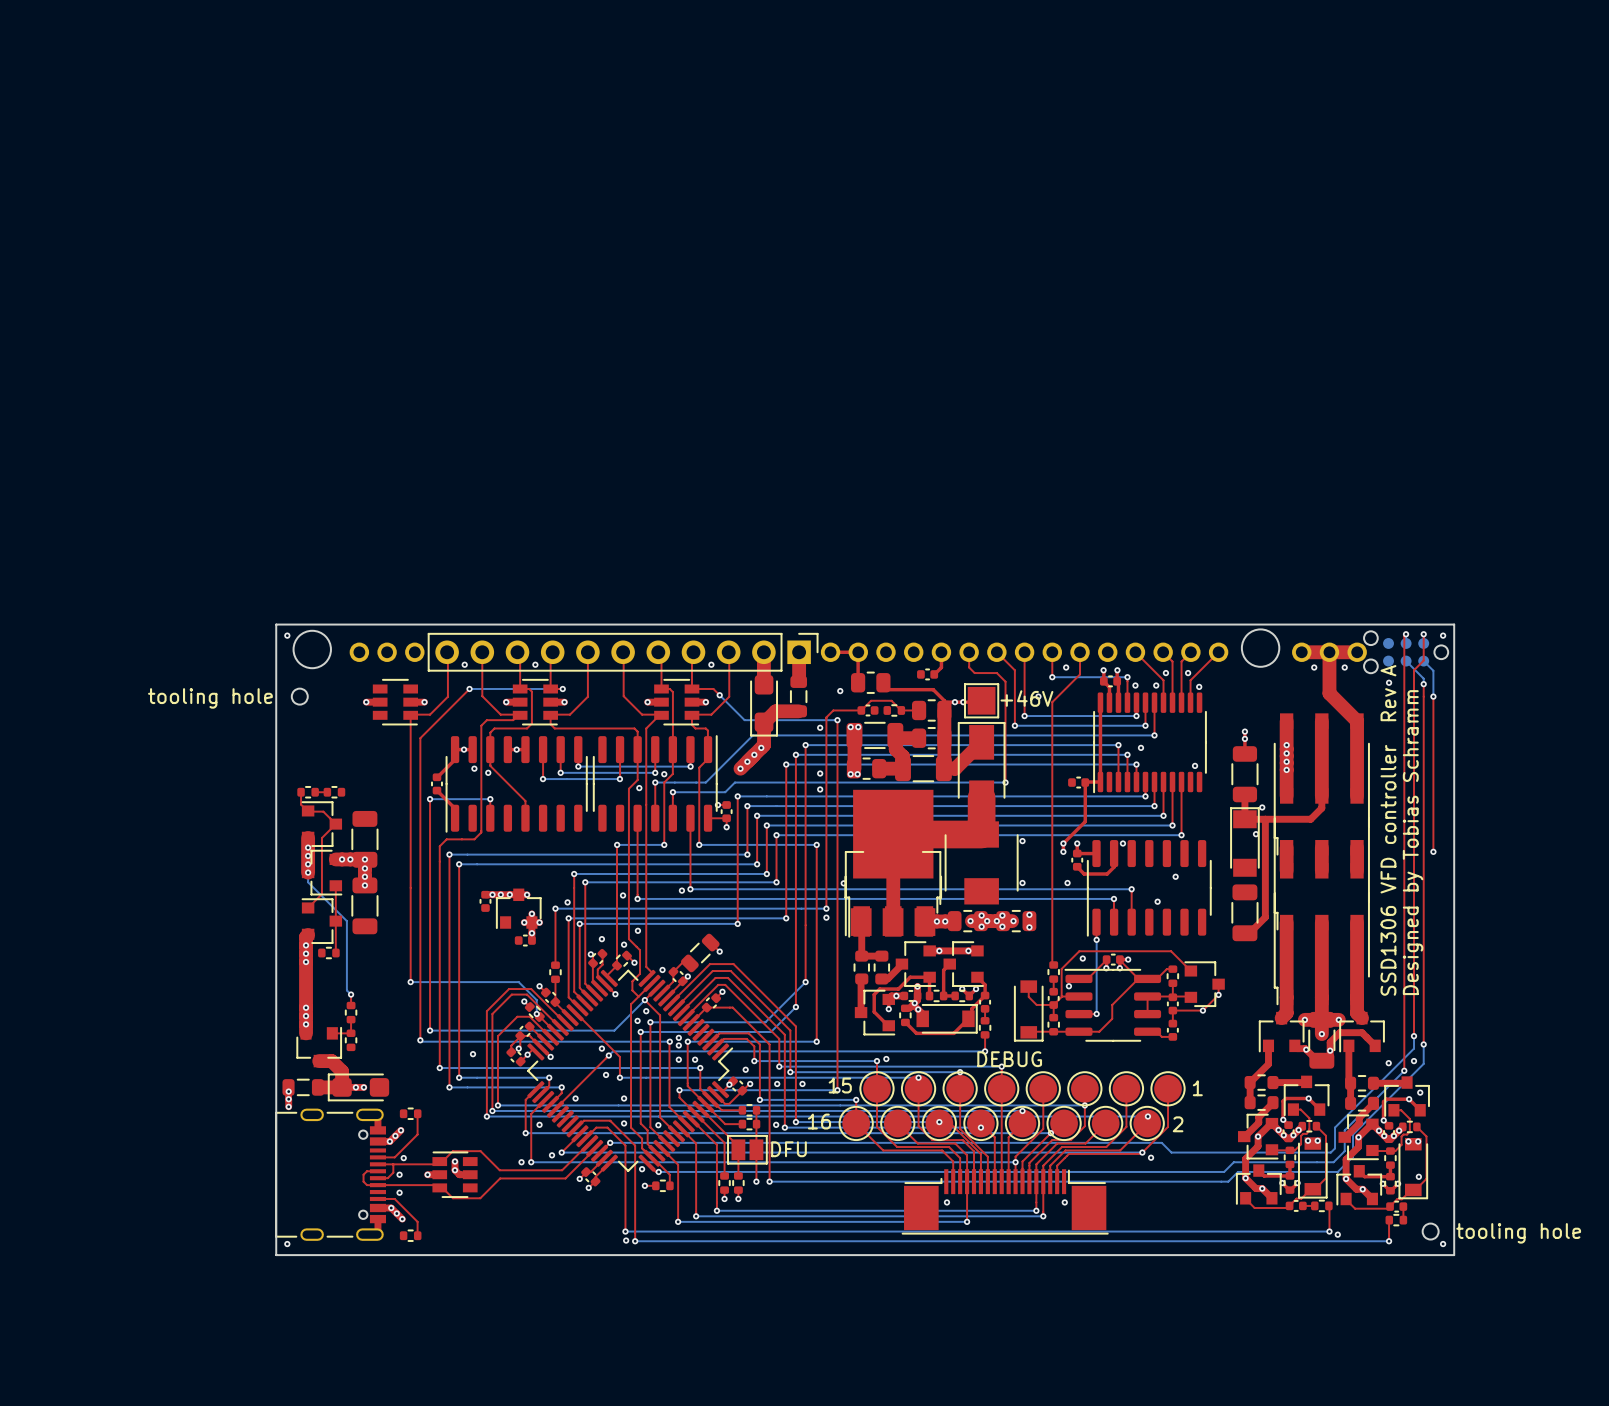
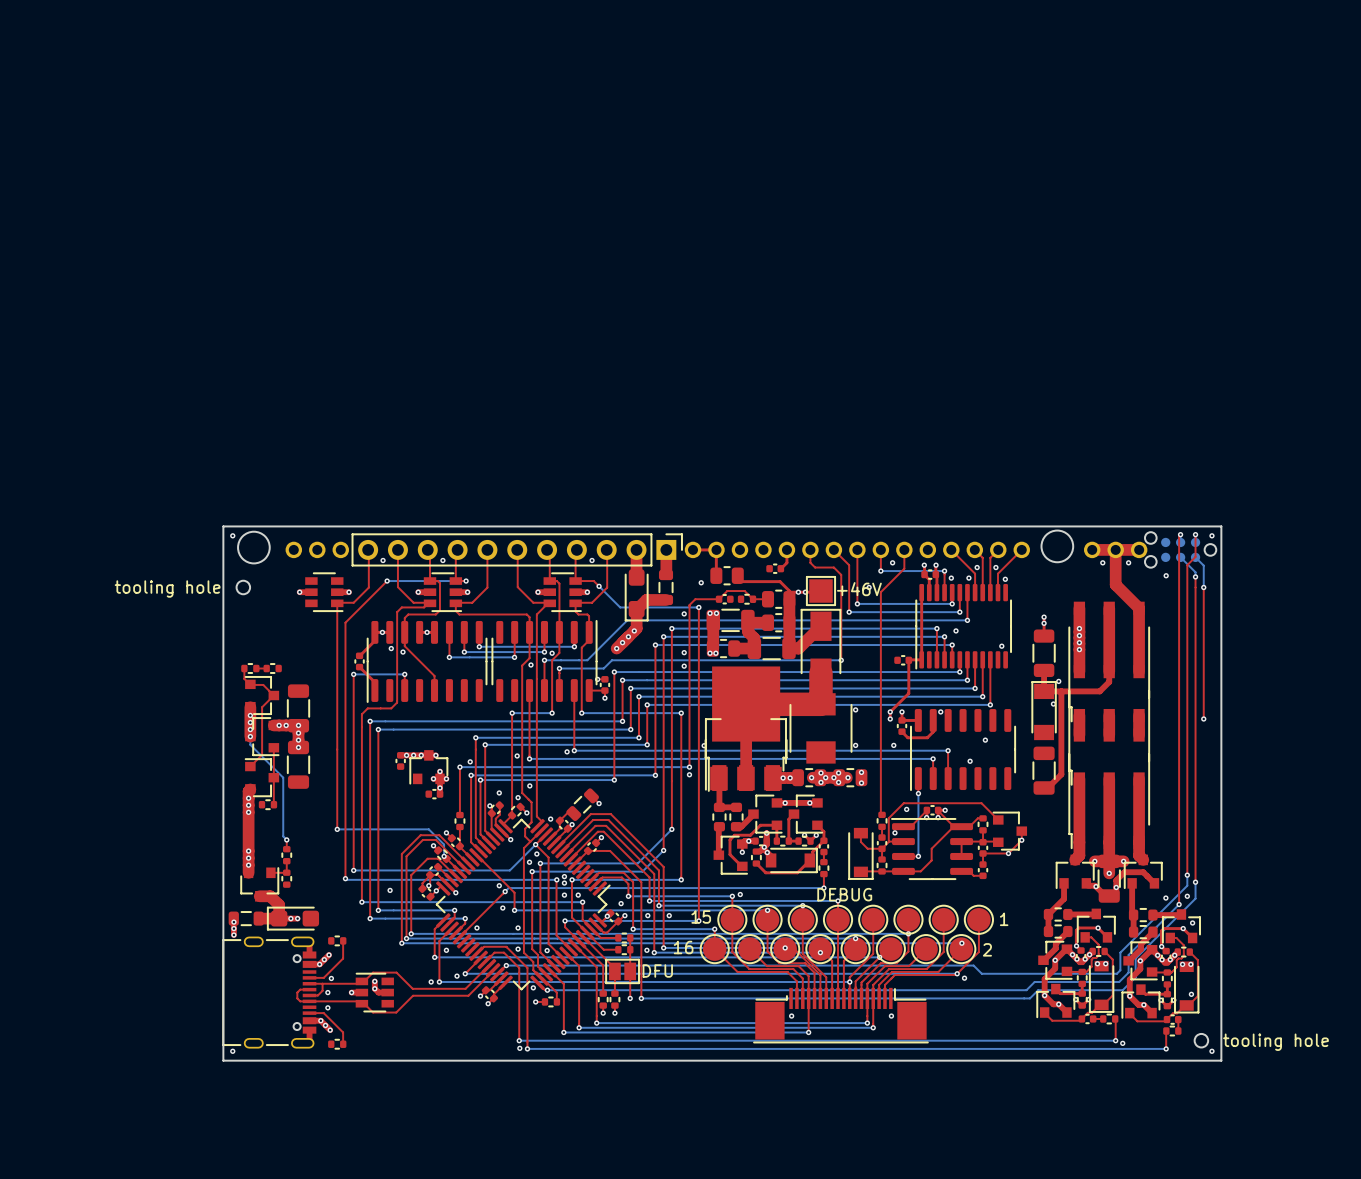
text: SSD1306 VFD controller Rev A (1388, 830) -> none
text: Designed by Tobias Schramm (1413, 842) -> none

